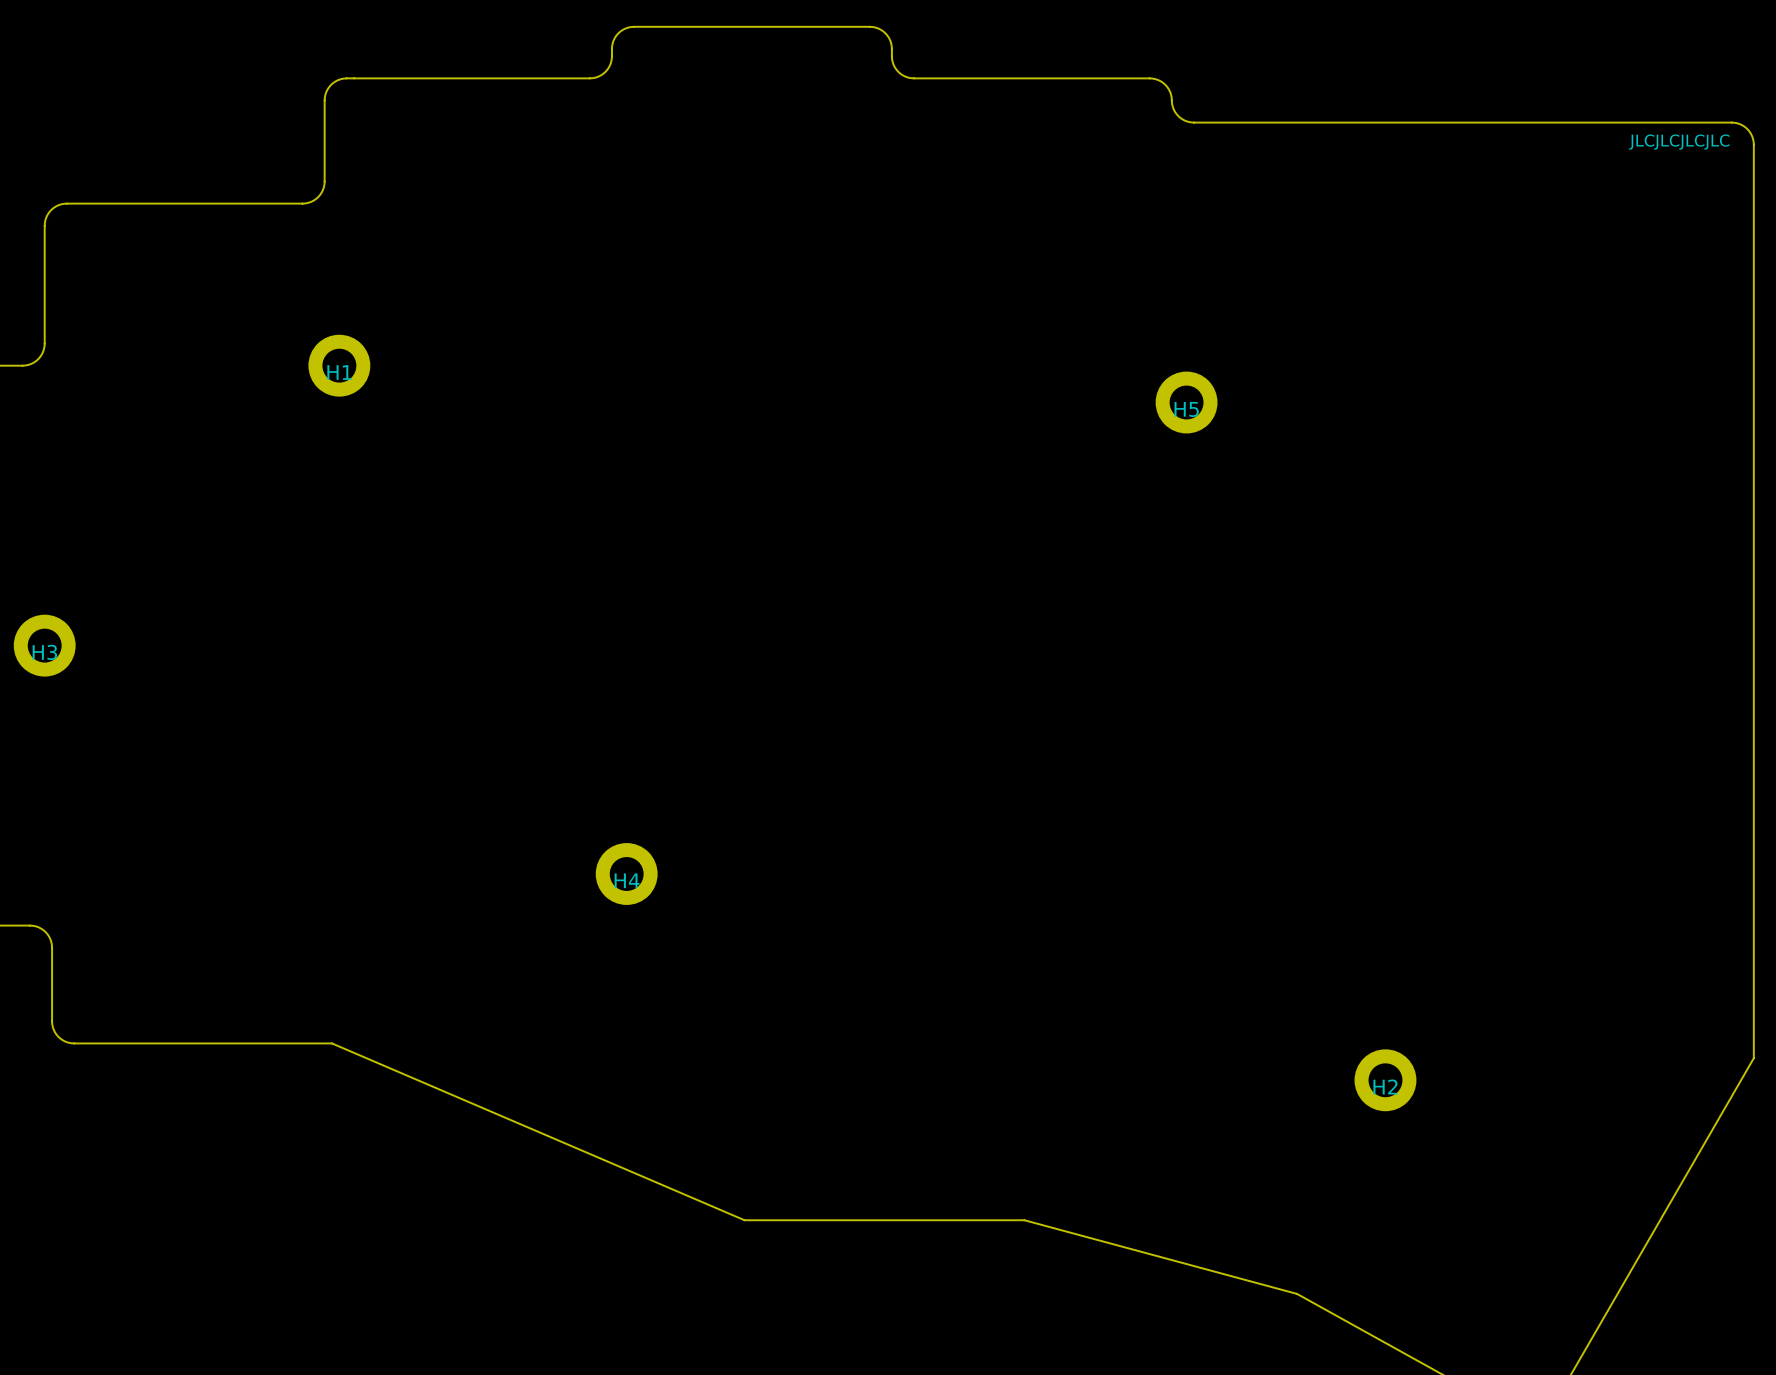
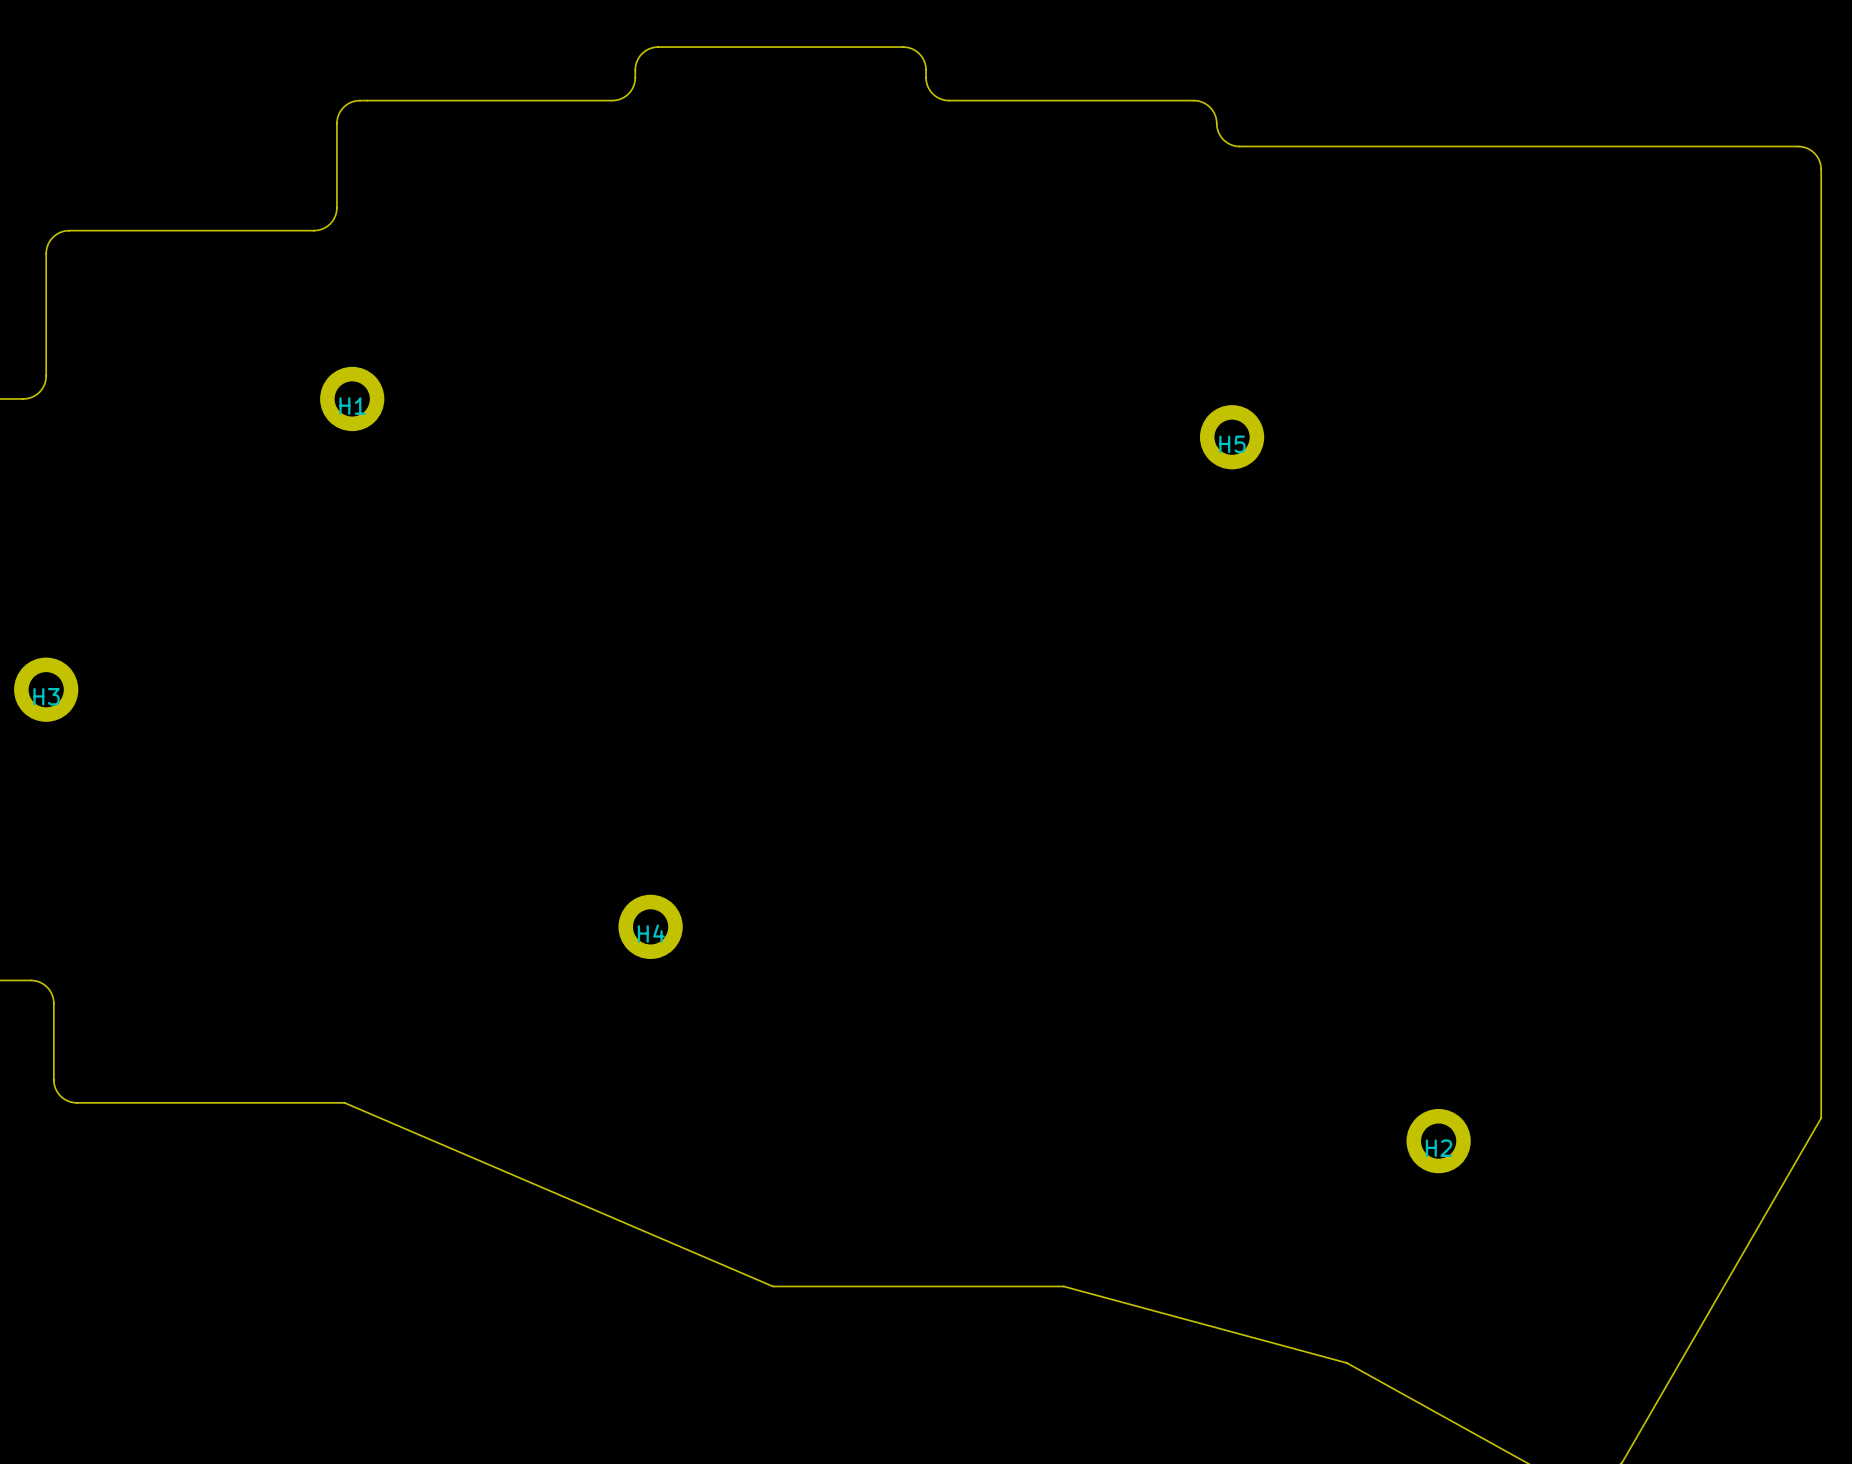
text: JLCJLCJLCJLC (1679, 142) -> none

